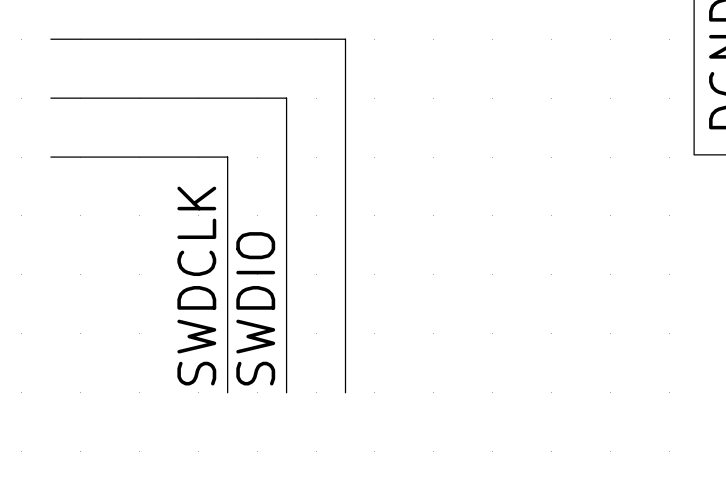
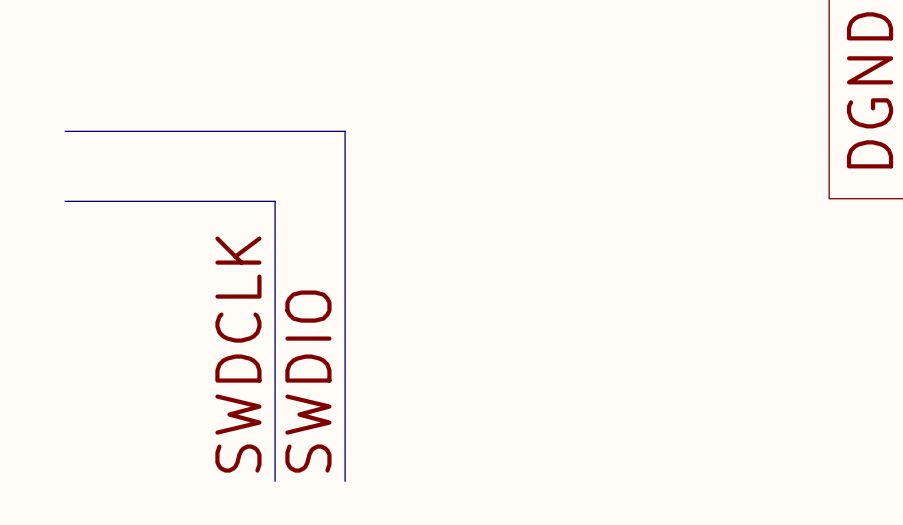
wire: (50, 39) (345, 39) (345, 392) -> none

